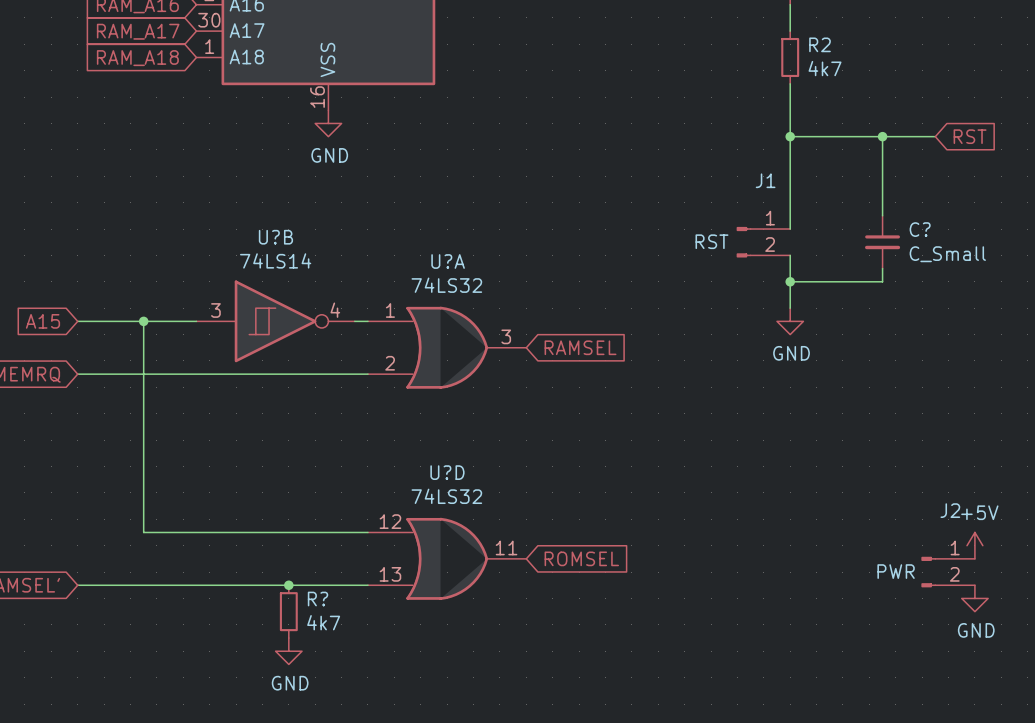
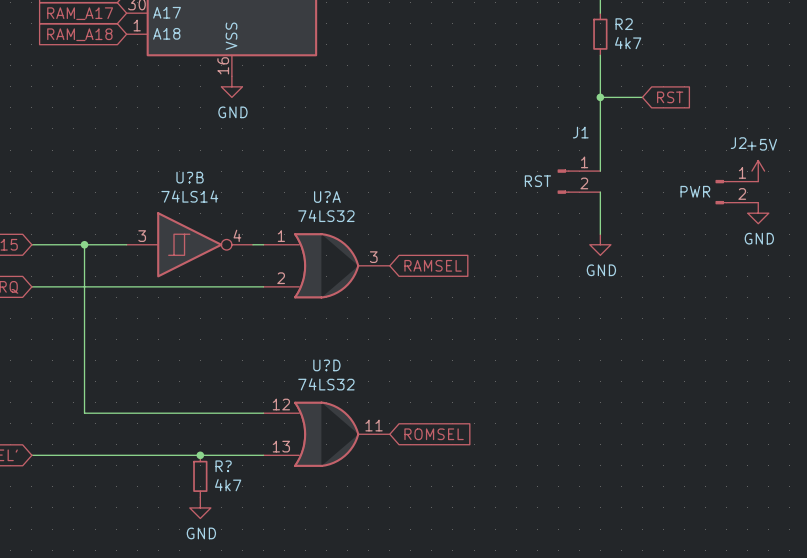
wire: (842, 136) (935, 136) -> none
wire: (882, 136) (882, 215) -> none
junction: (882, 136) -> none
global label position: RST (970, 136) -> RST (670, 97)
power symbol: none -> +5V (758, 171)
C?: C_Small (882, 242) -> none
wire: (882, 268) (882, 281) (790, 281) -> none
junction: (790, 281) -> none
power symbol: none -> GND (758, 213)
power symbol: +5V (974, 545) -> none
J2 position: (948, 572) -> (736, 192)
power symbol: GND (974, 598) -> none

